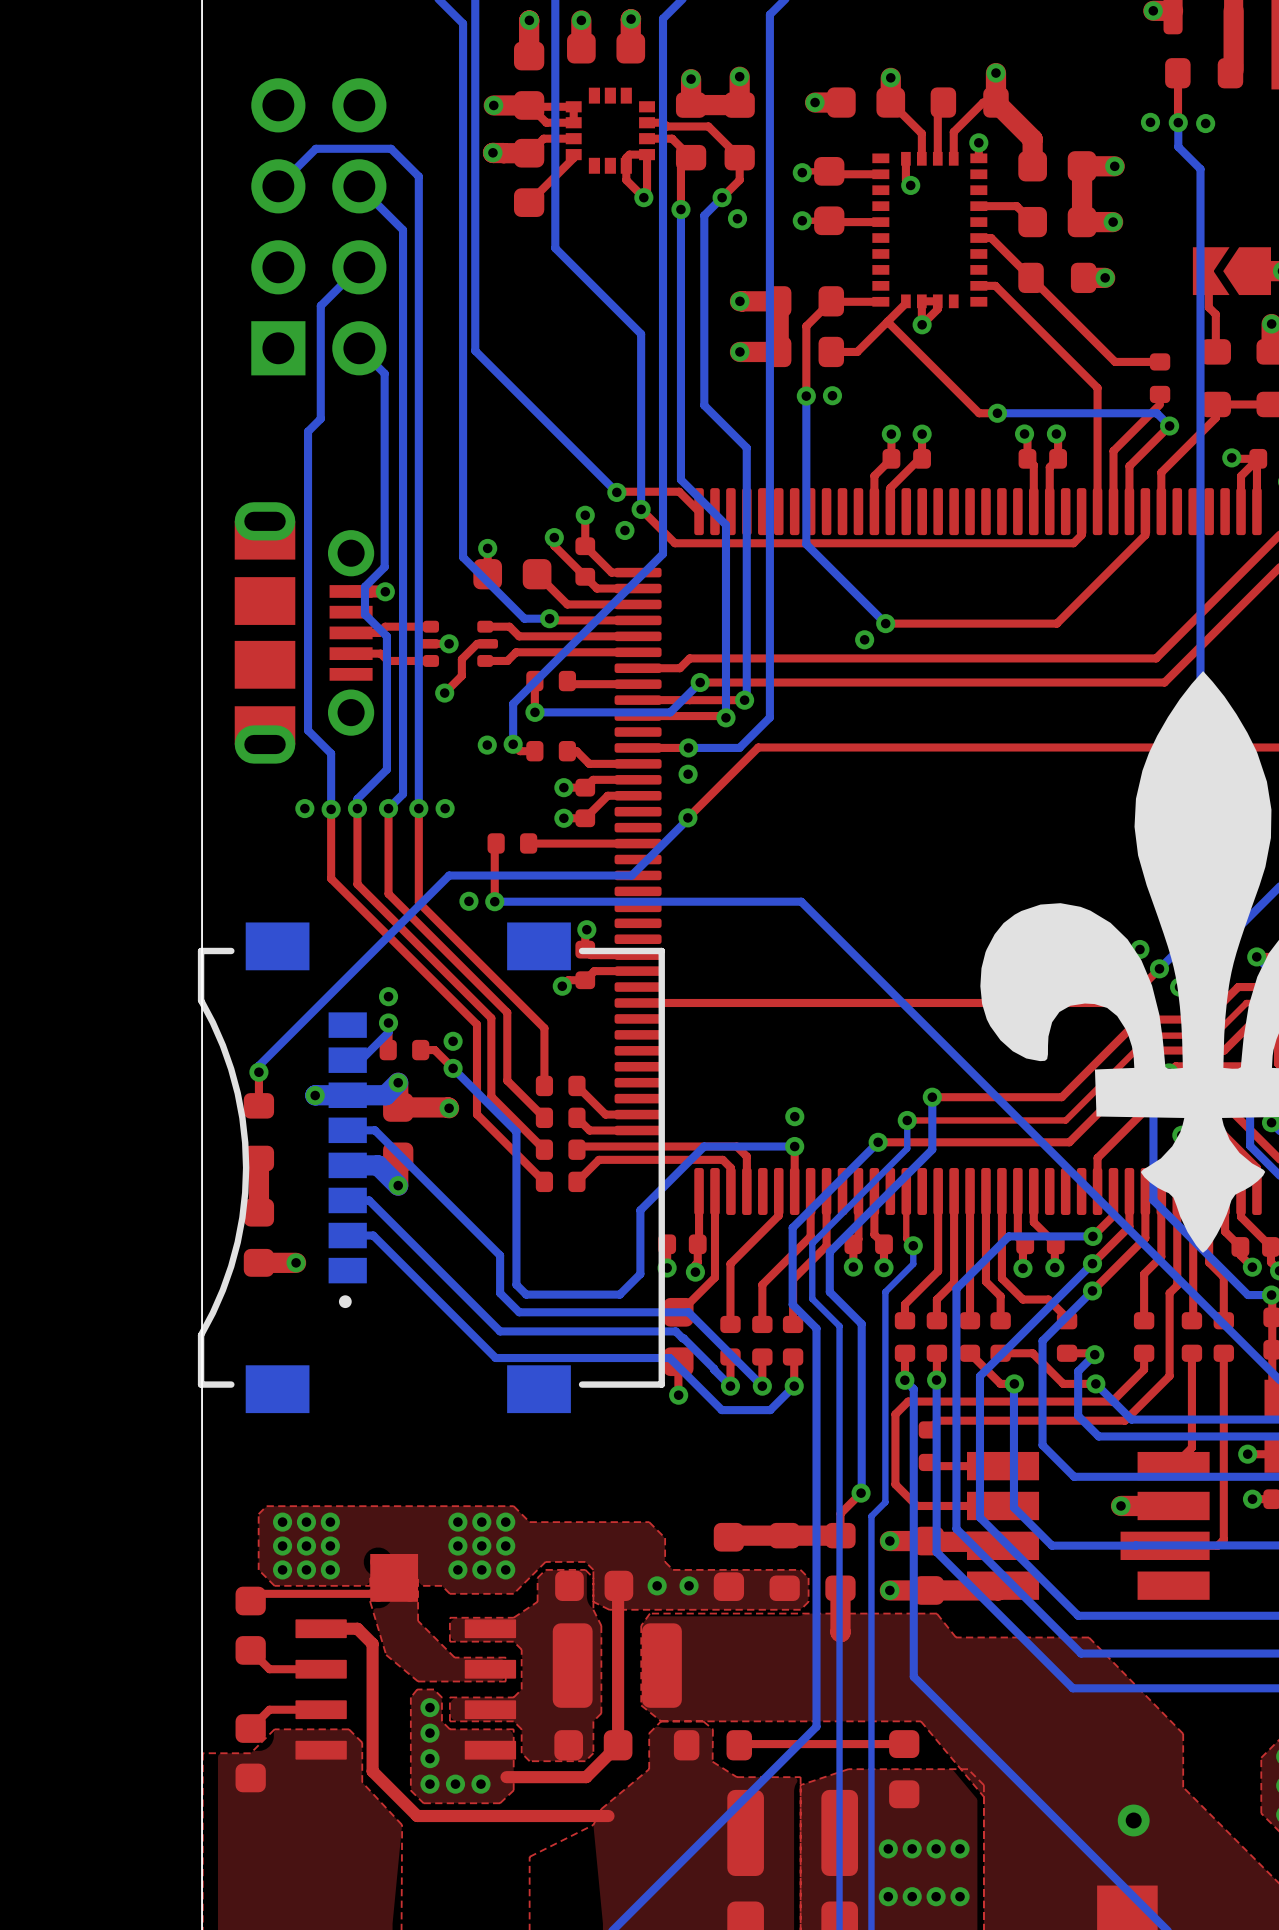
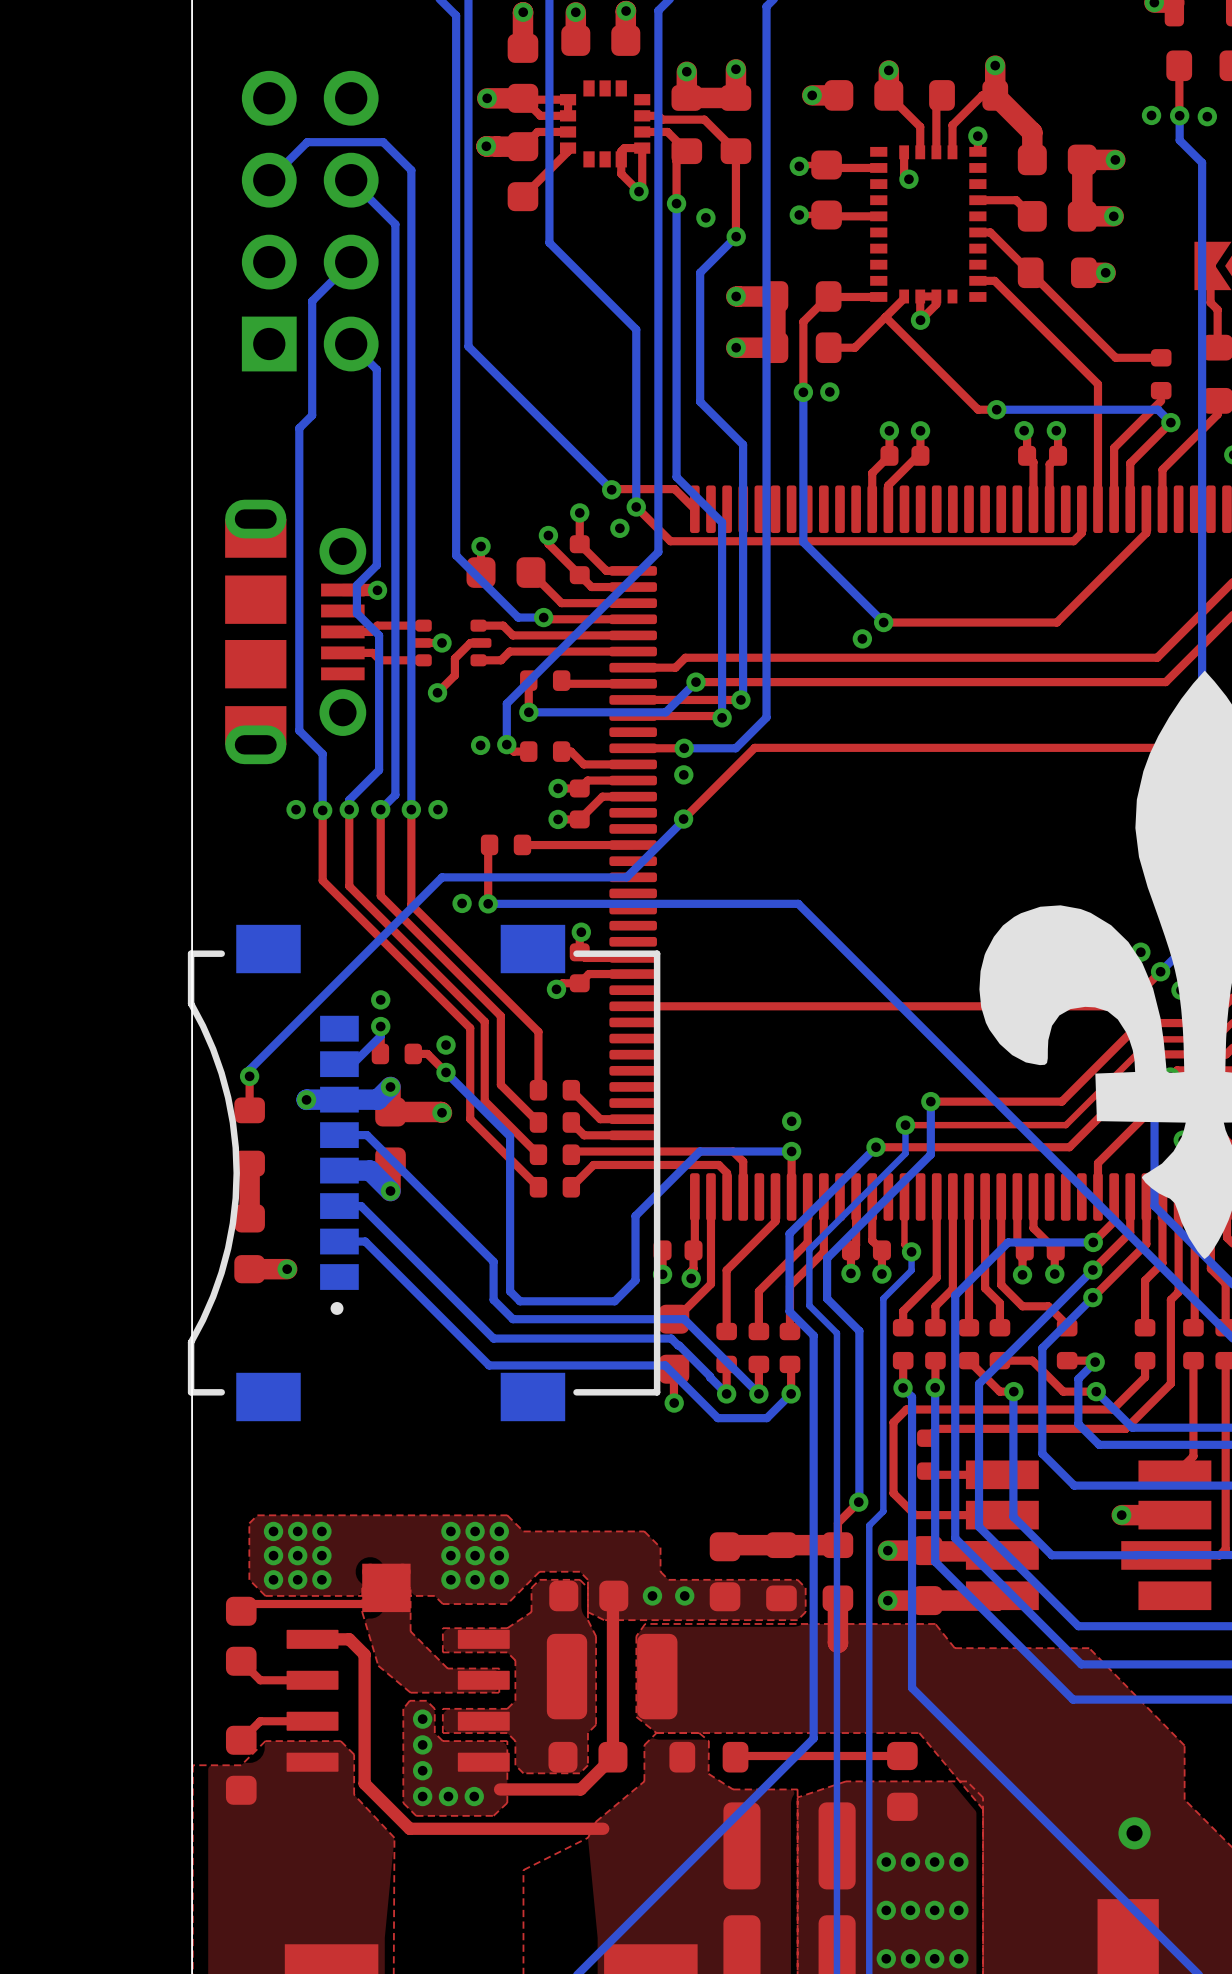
top track: (739, 180) (722, 197) -> (735, 173) (735, 236)
bottom track: (722, 197) (704, 215) (704, 277) -> (736, 236) (700, 272)
via: (722, 197) -> none
via: (737, 218) -> none
via: none -> (705, 217)
via: none -> (736, 236)

